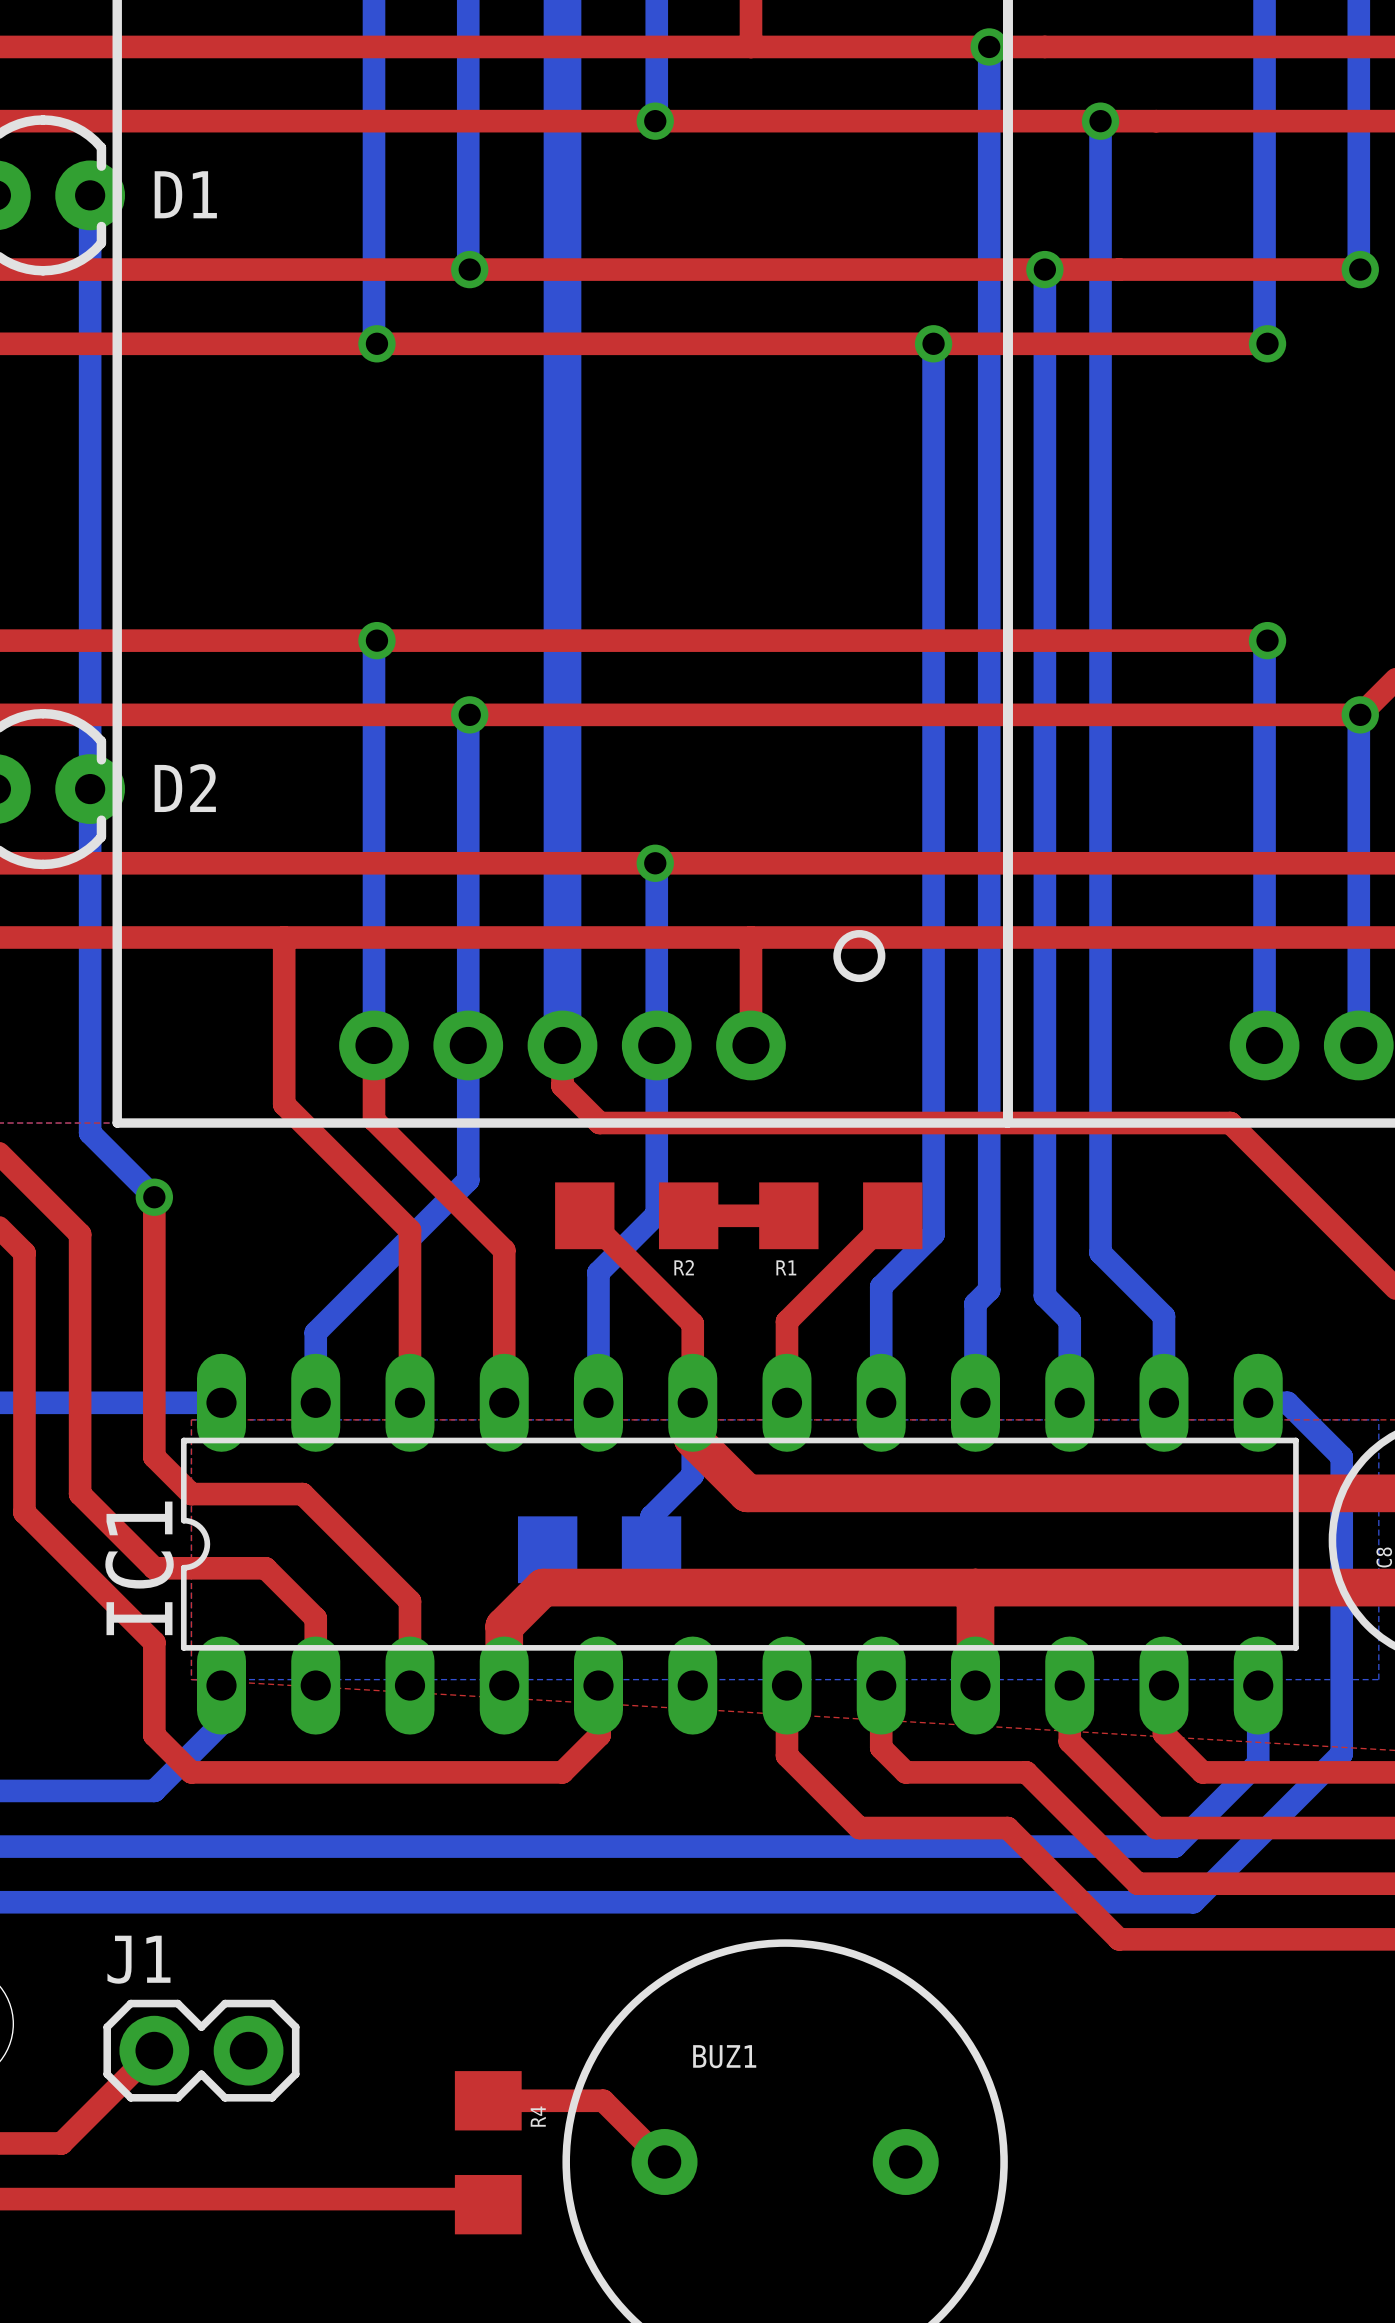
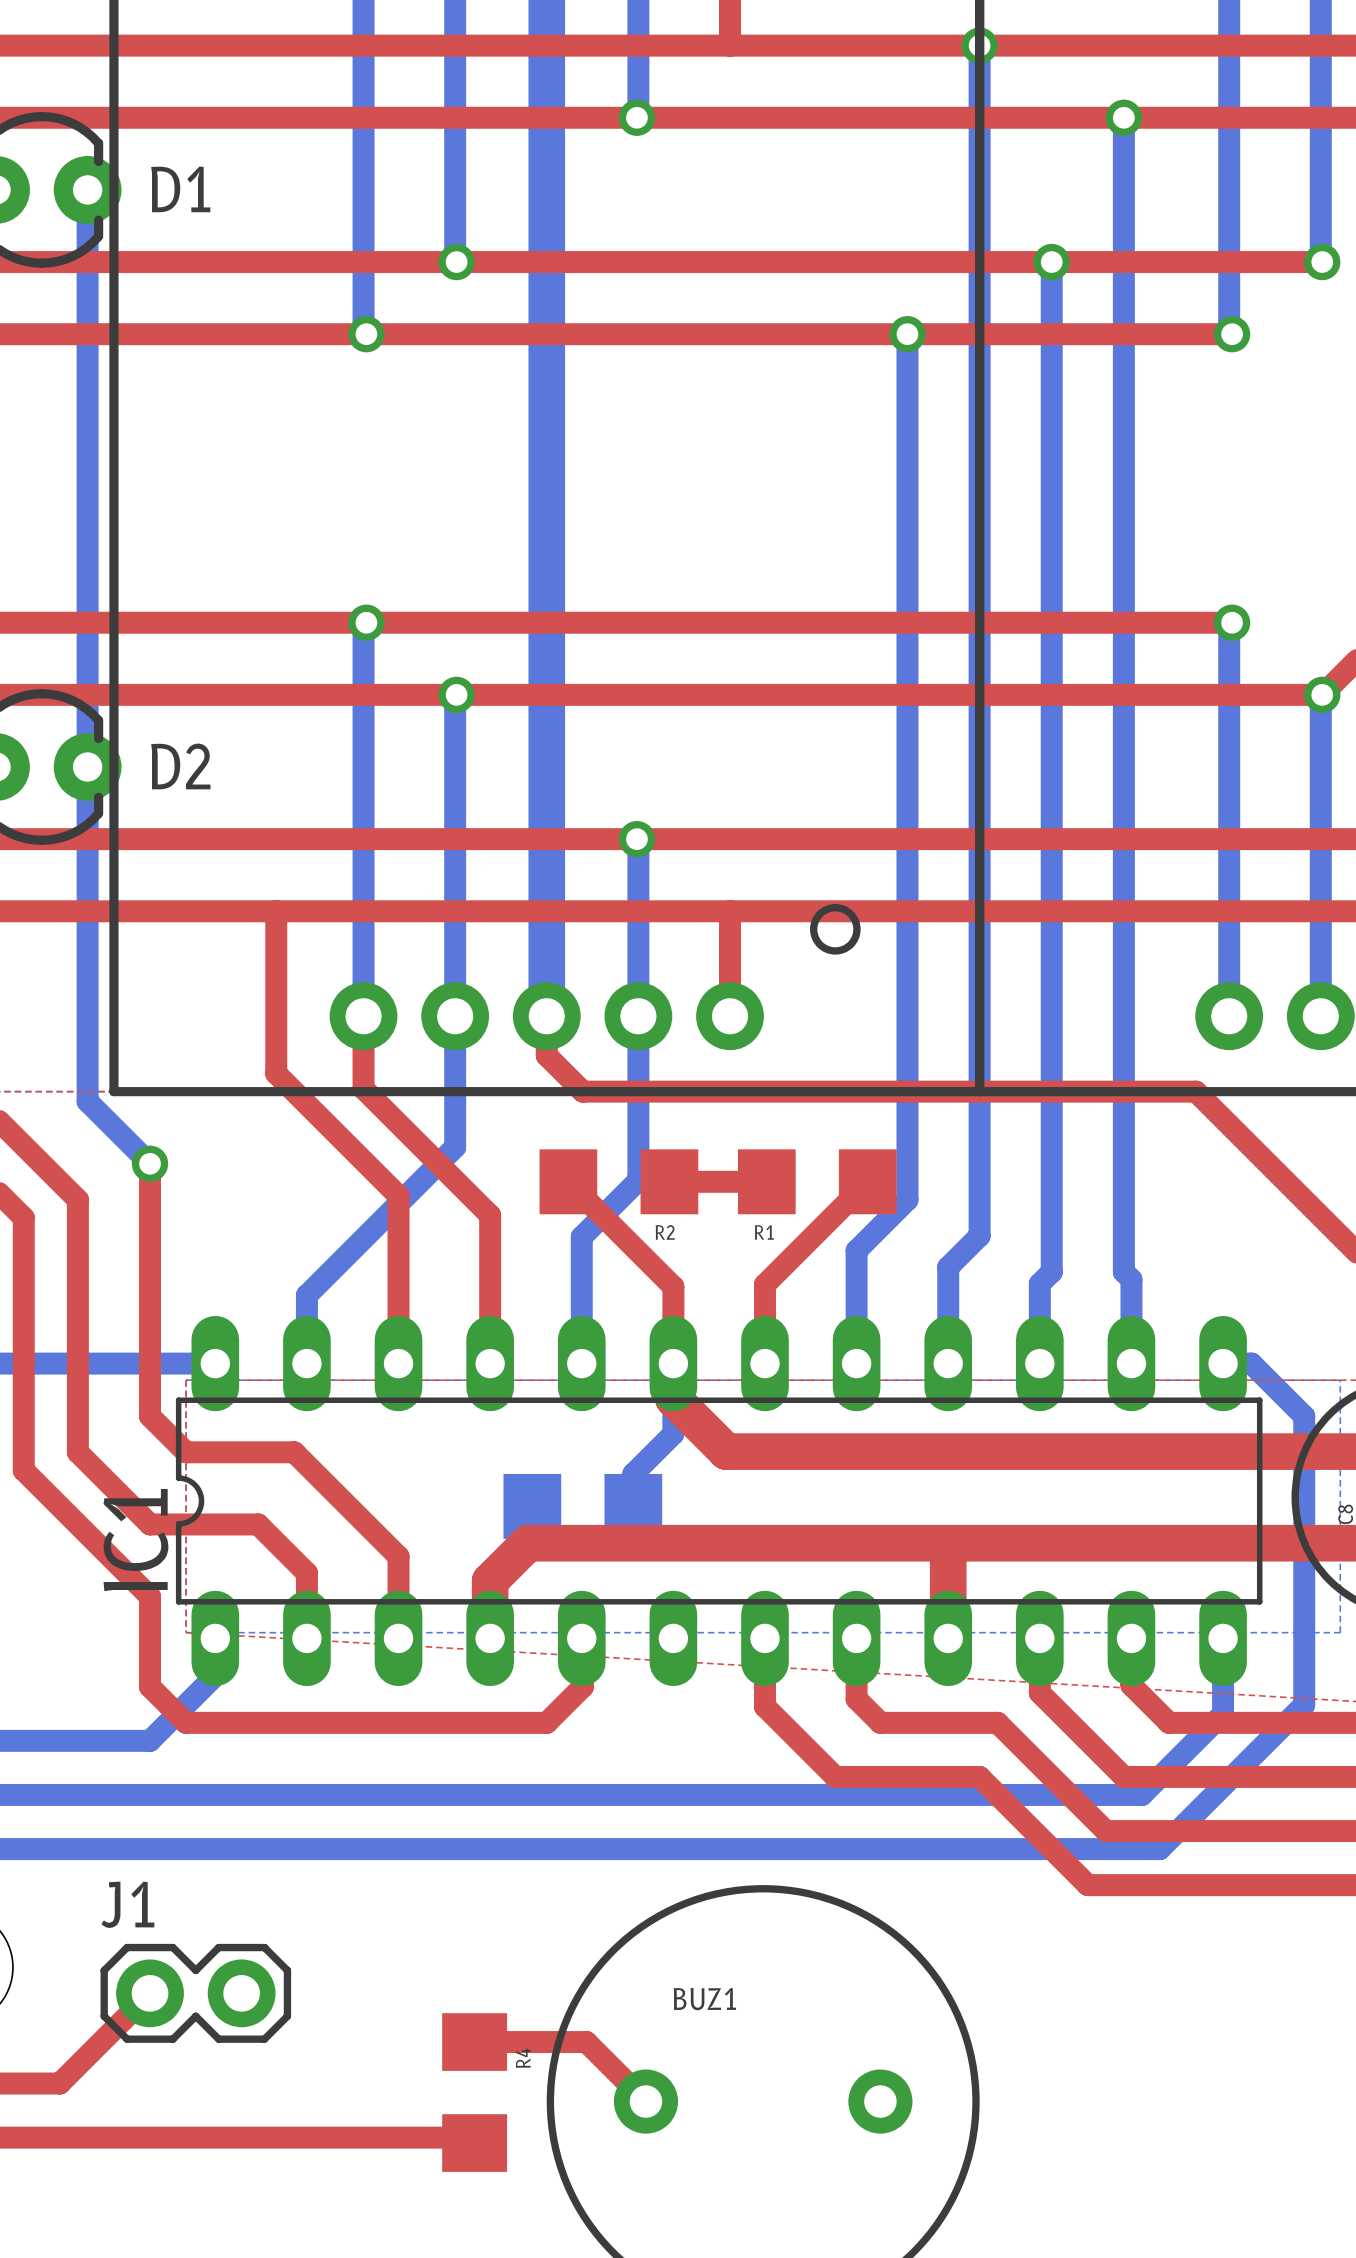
bottom track: (989, 46) (989, 1290) -> (979, 45) (979, 1235) (961, 1253)
via position: (989, 46) -> (979, 45)
bottom track: (1100, 121) (1100, 1252) (1156, 1308) -> (1123, 117) (1123, 1271)
via position: (1100, 121) -> (1123, 117)
bottom track: (1044, 269) (1044, 1295) (1069, 1320) -> (1051, 262) (1051, 1271) (1039, 1283)
via position: (1044, 269) -> (1051, 262)

